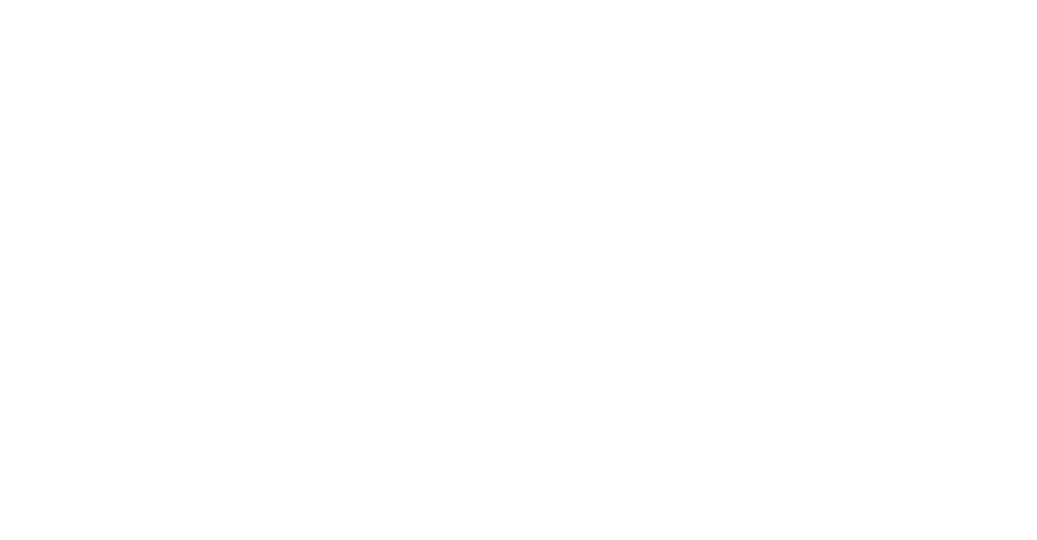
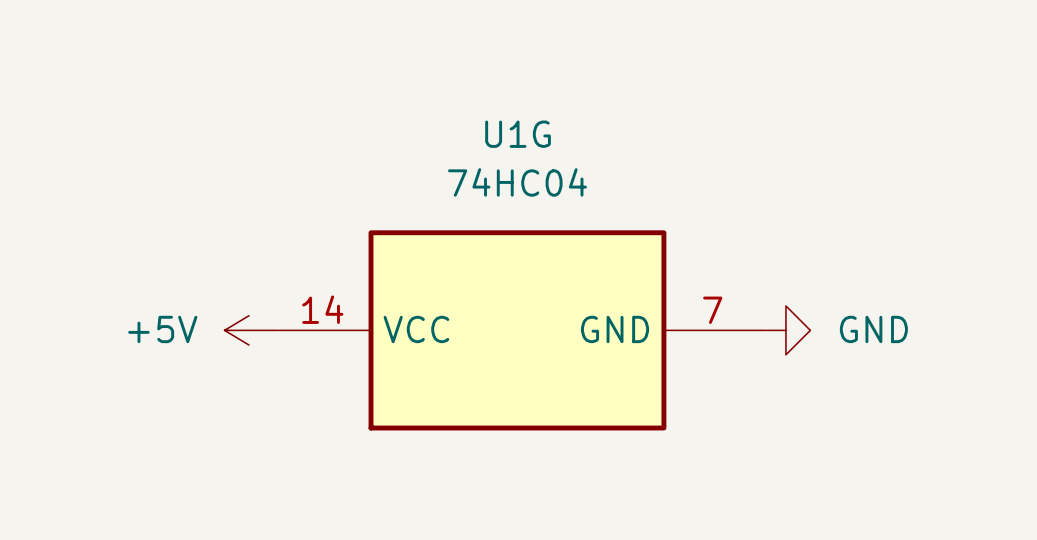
power symbol: none -> +5V (248, 330)
U1G: none -> 74HC04 (517, 330)
power symbol: none -> GND (785, 330)

